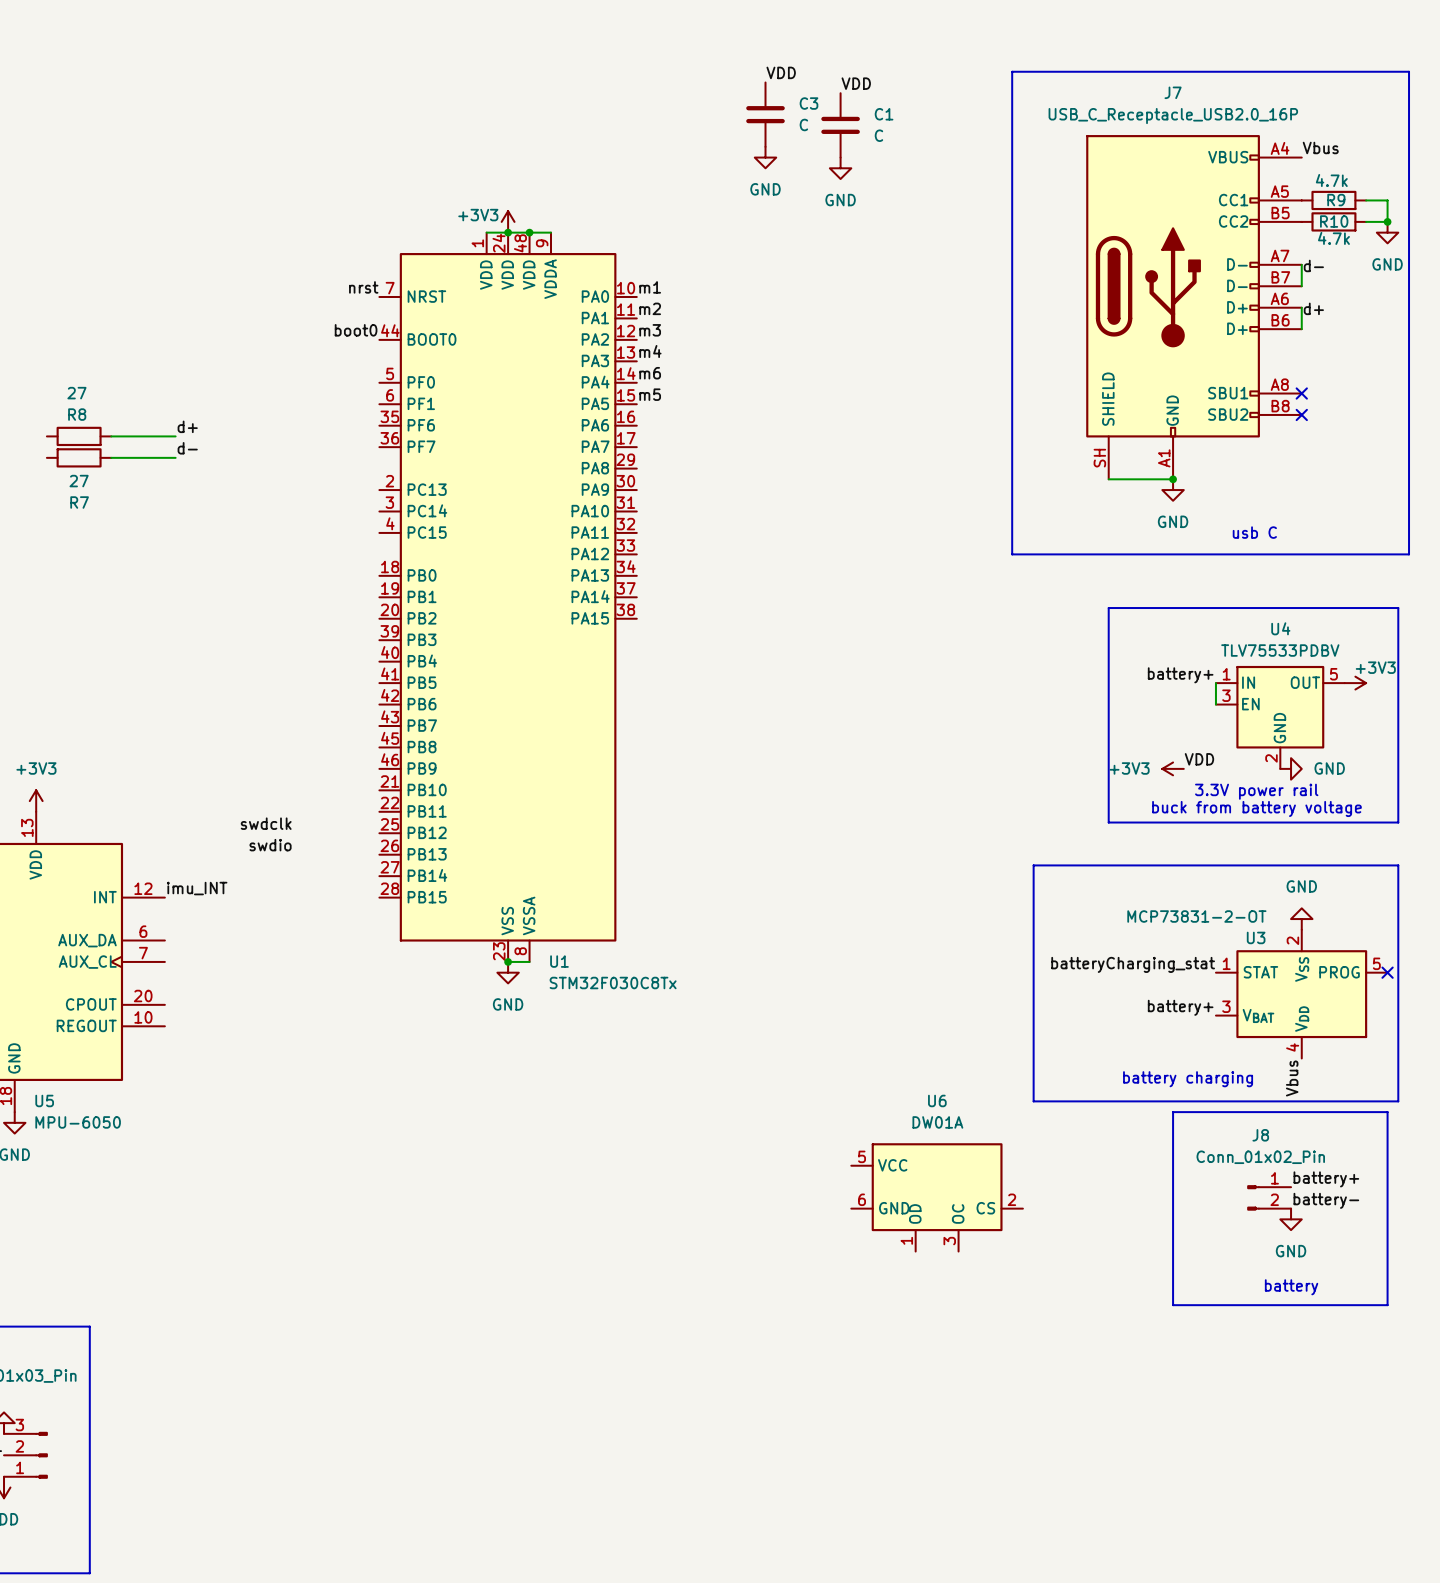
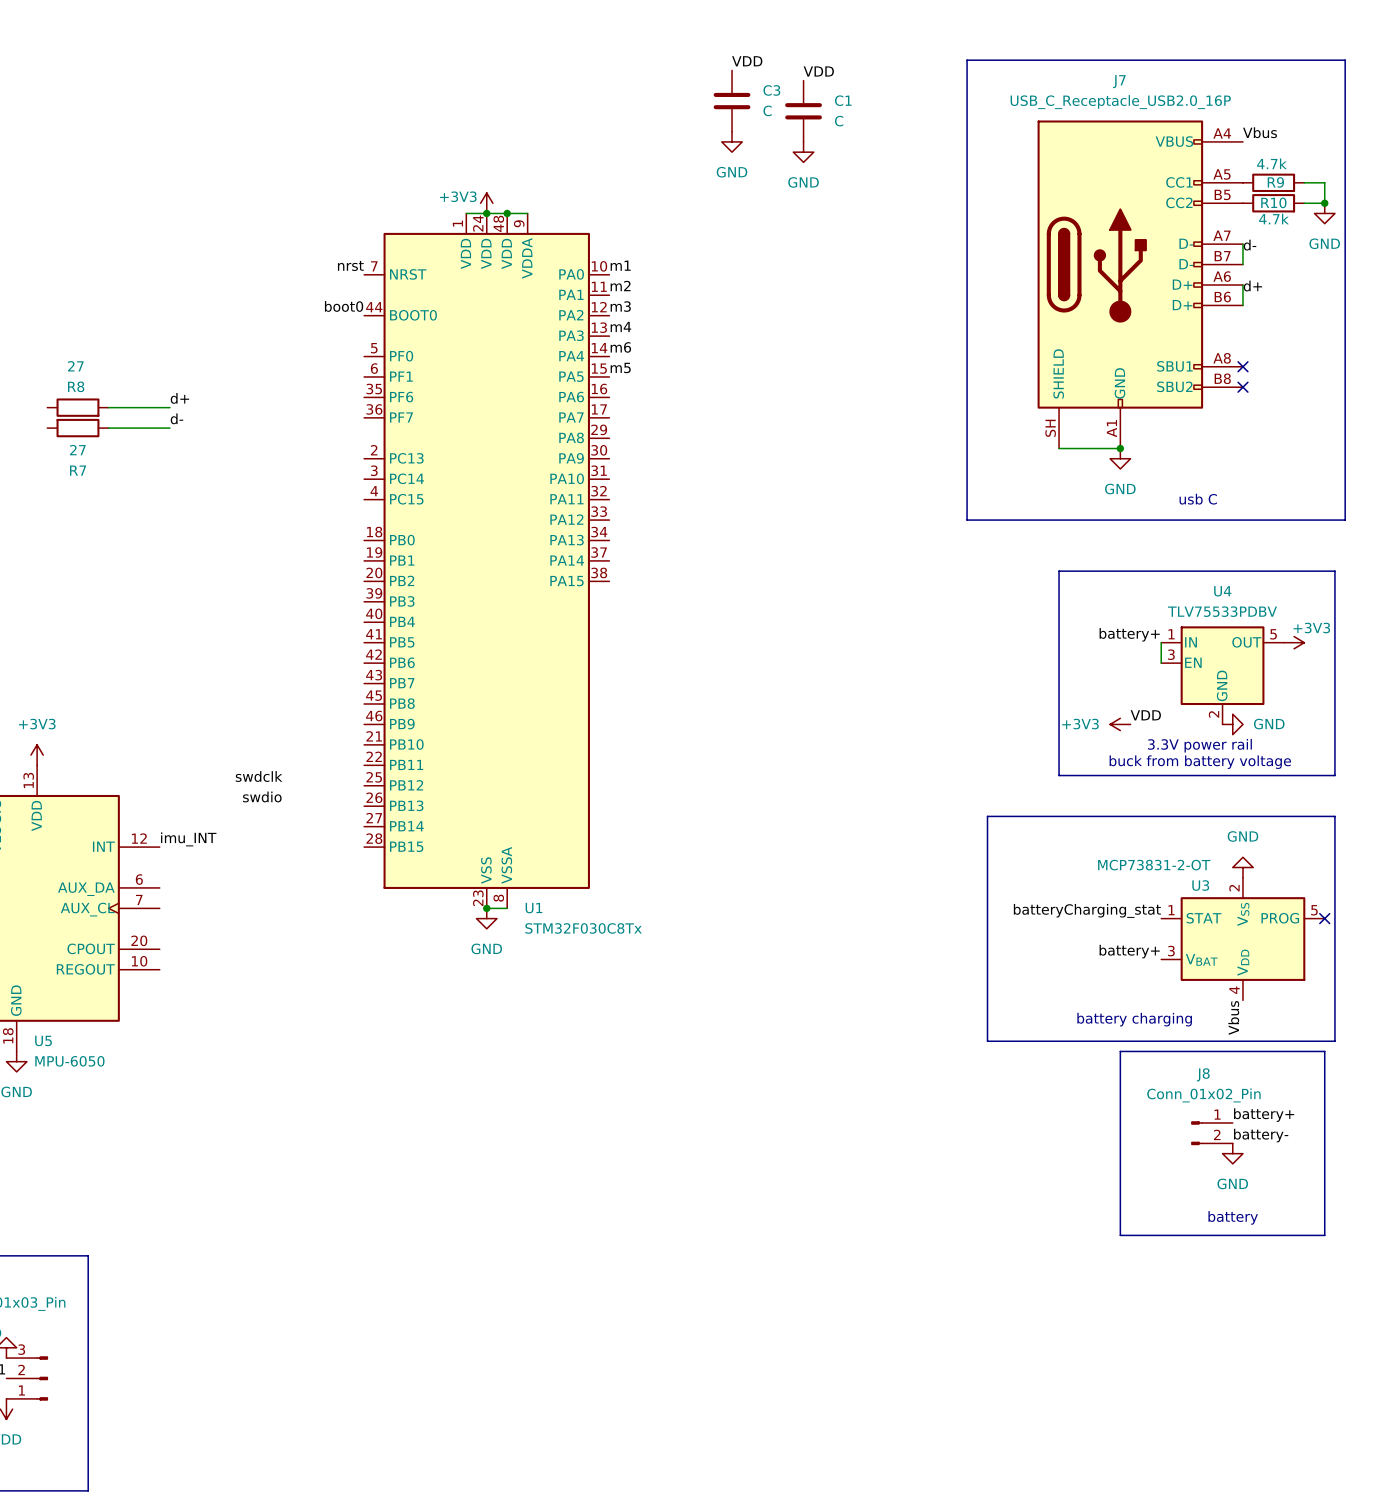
U6: DW01A (937, 1197) -> none

